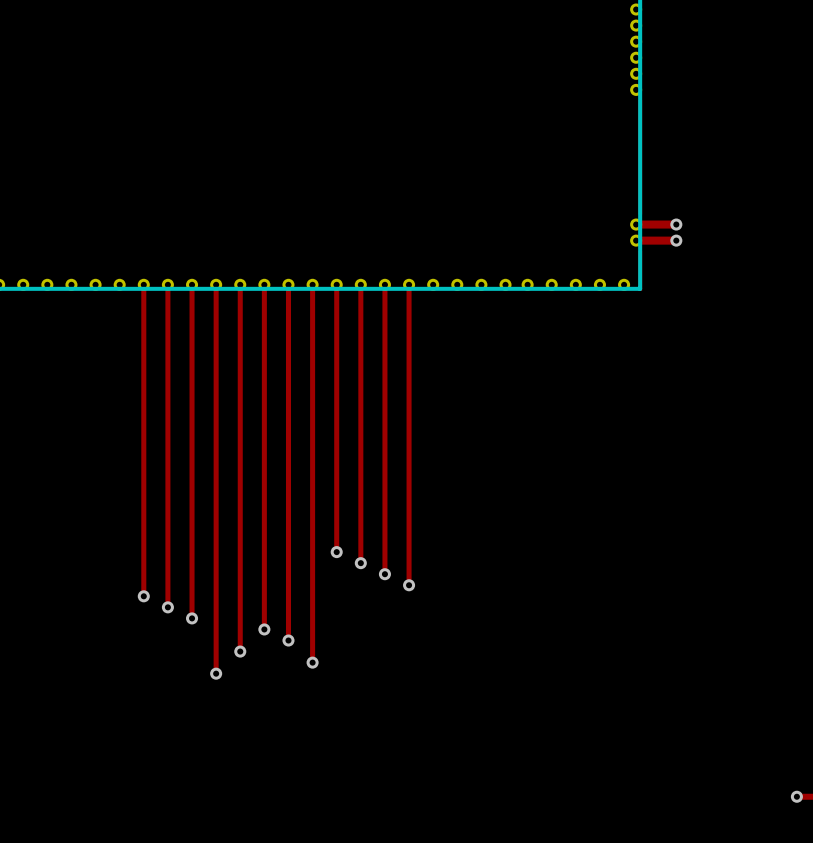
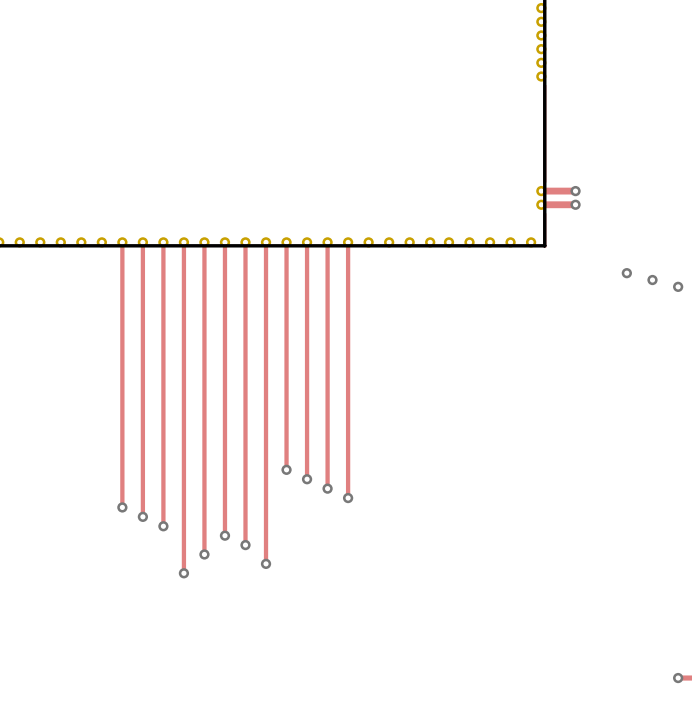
via: none -> (626, 273)
via: none -> (652, 280)
via: none -> (678, 286)

